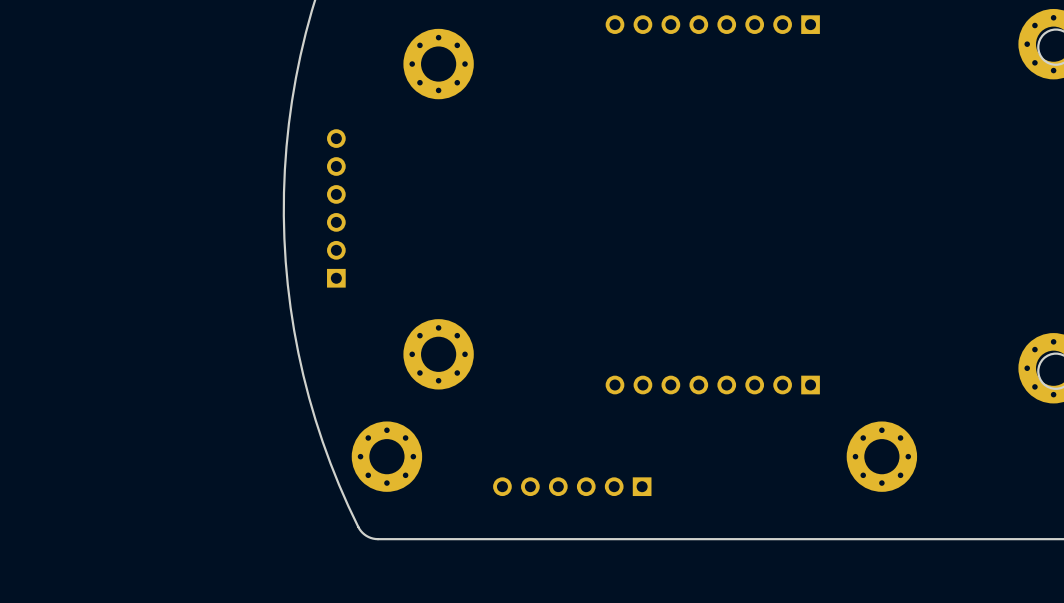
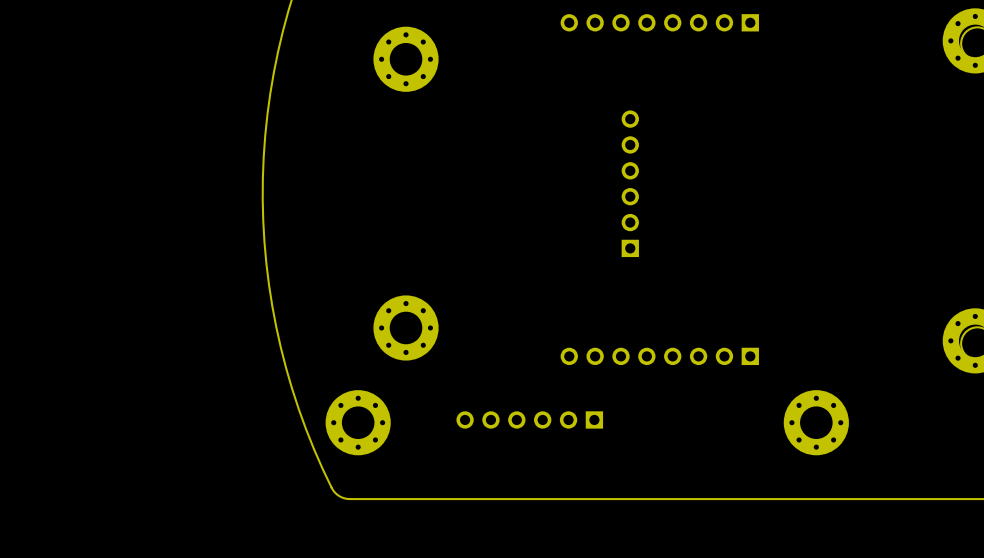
part: none -> (630, 183)
part: (336, 208) -> none
part position: (572, 486) -> (529, 419)

